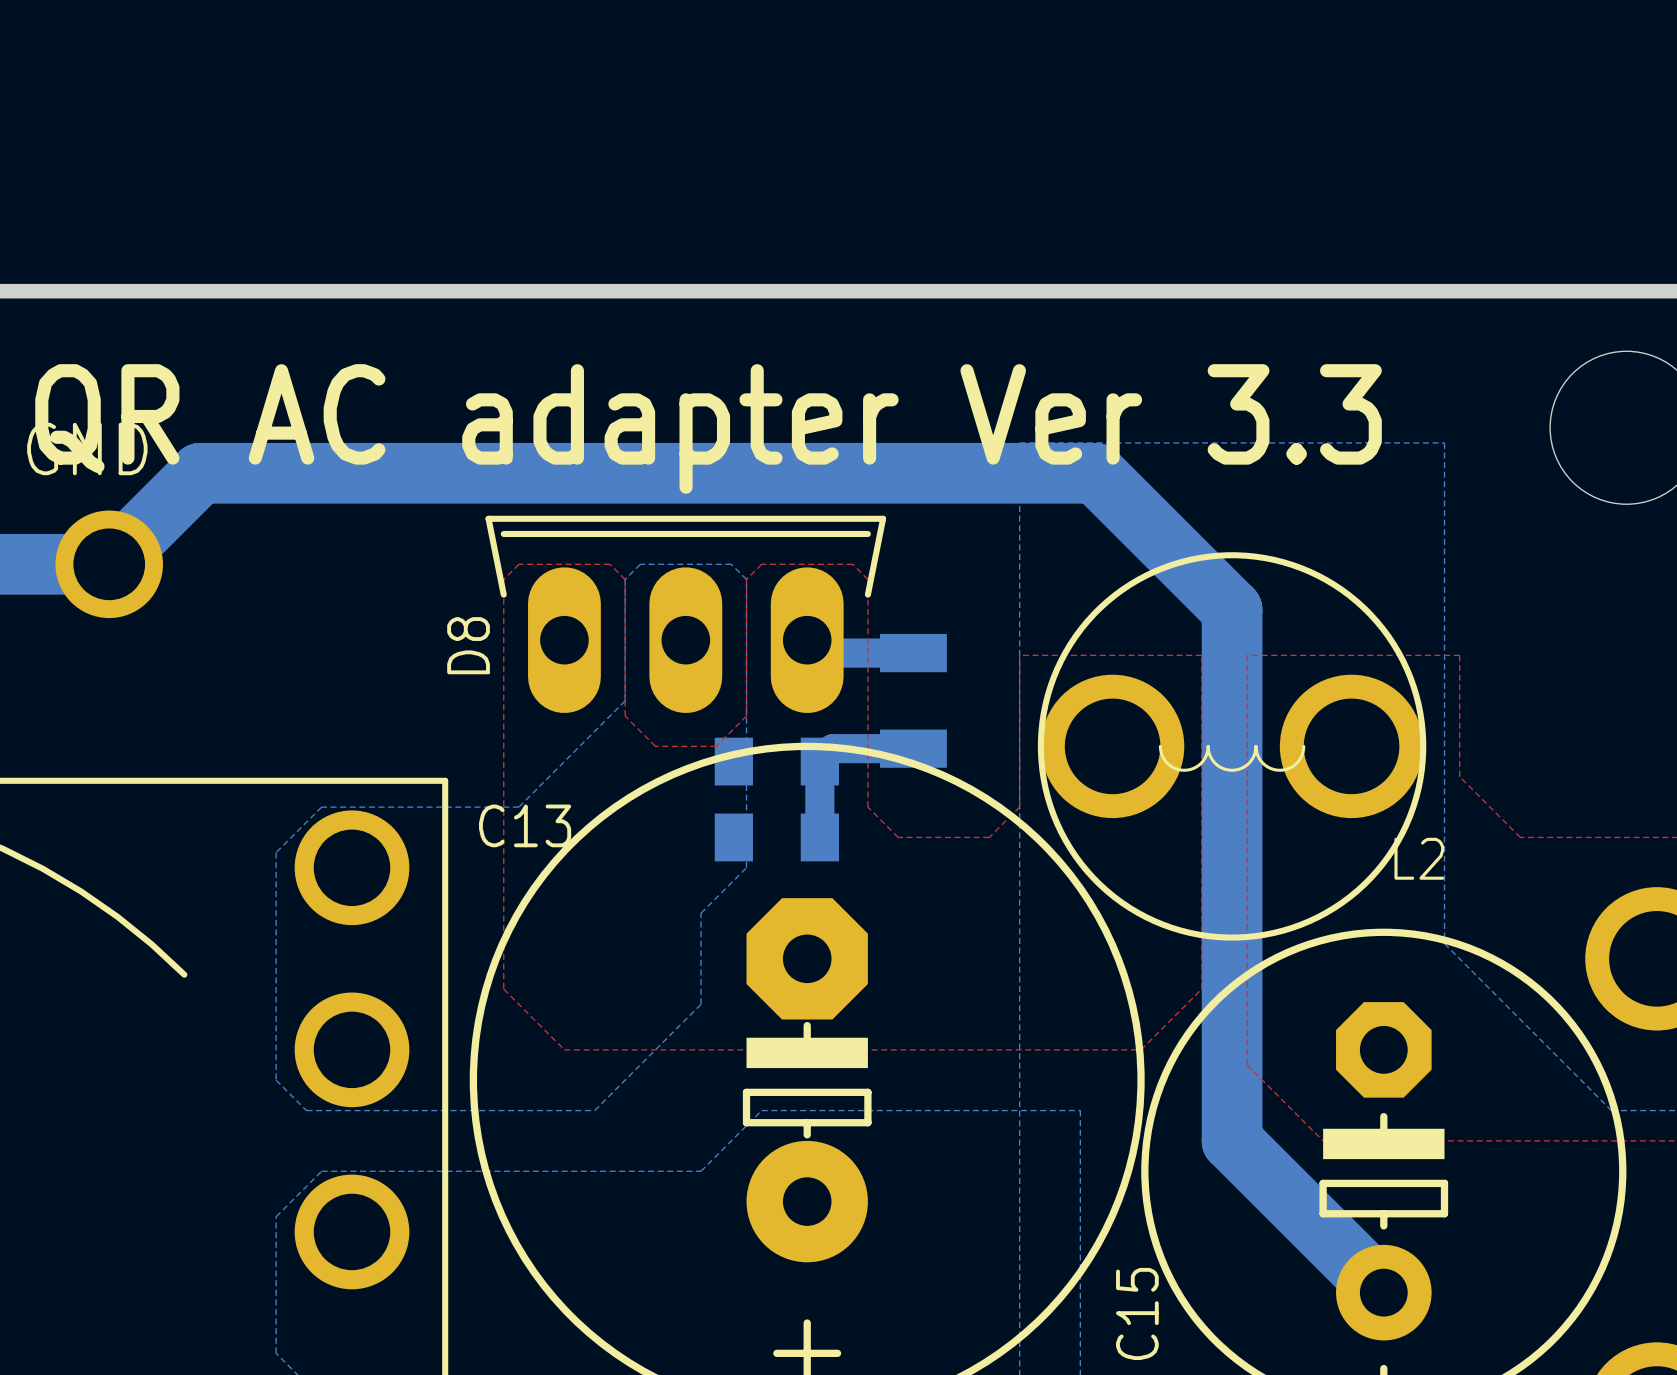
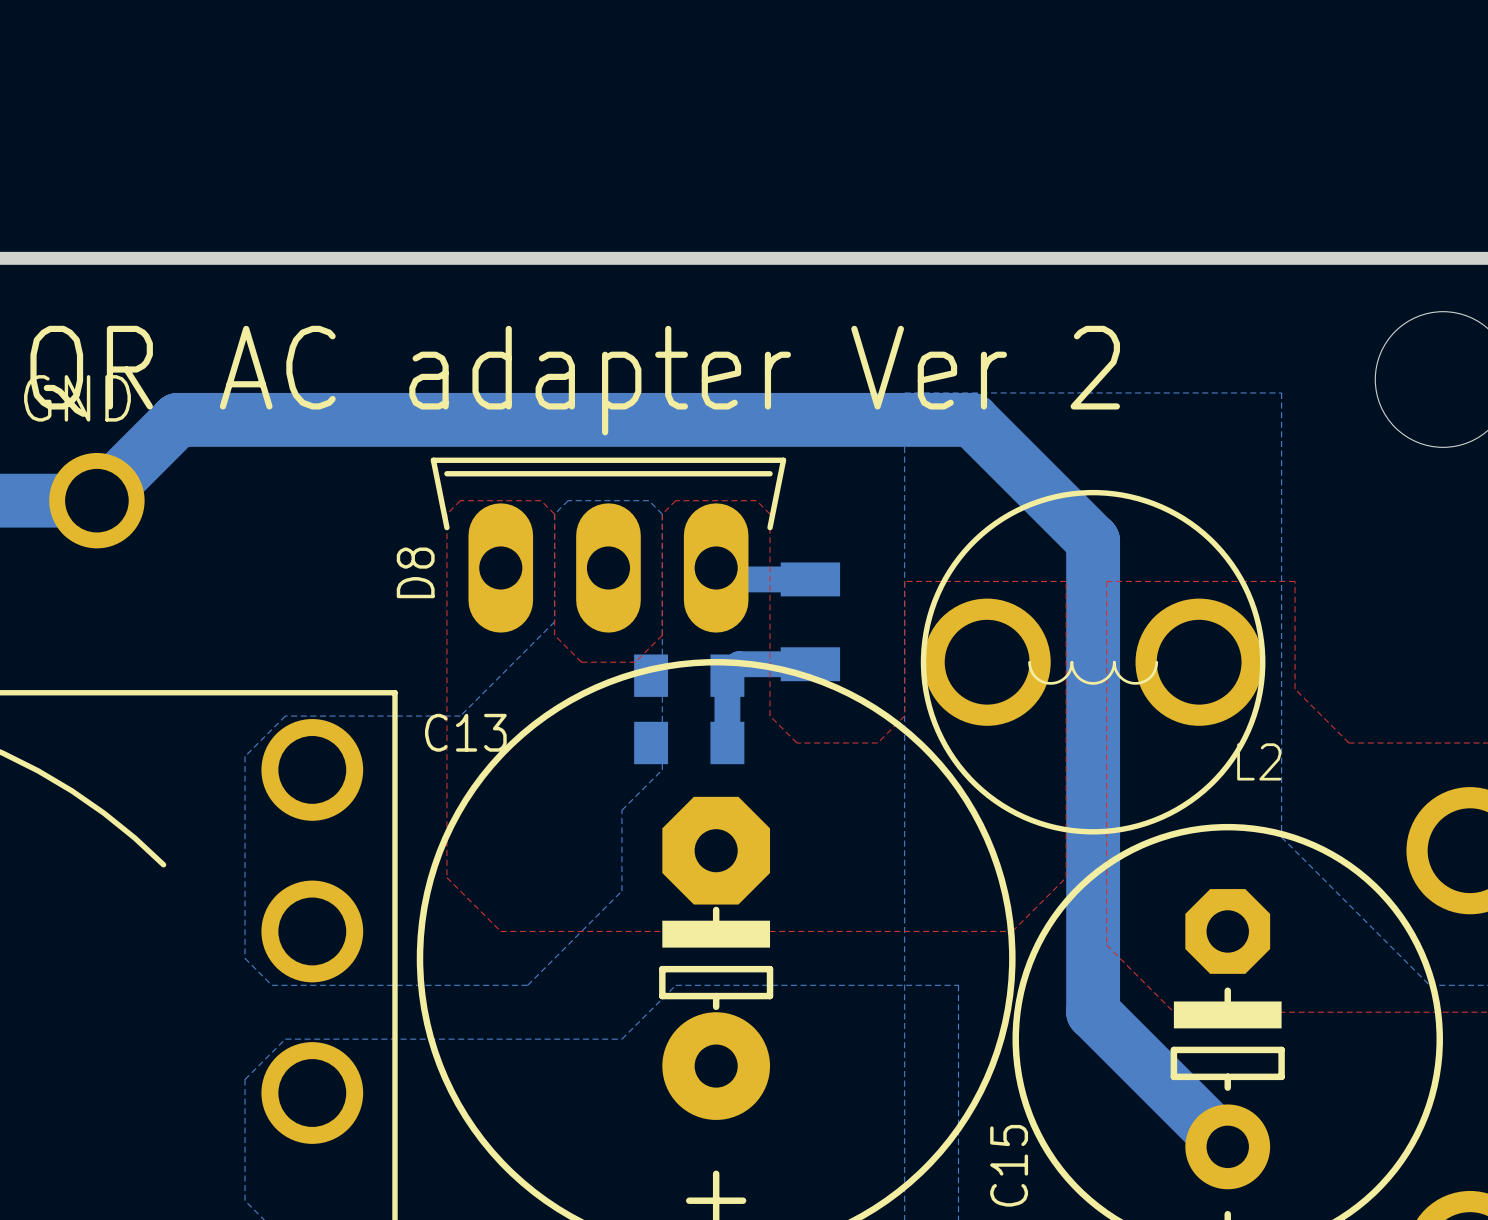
text: QR AC adapter Ver 3.3 (708, 428) -> QR AC adapter Ver 2 (575, 380)

